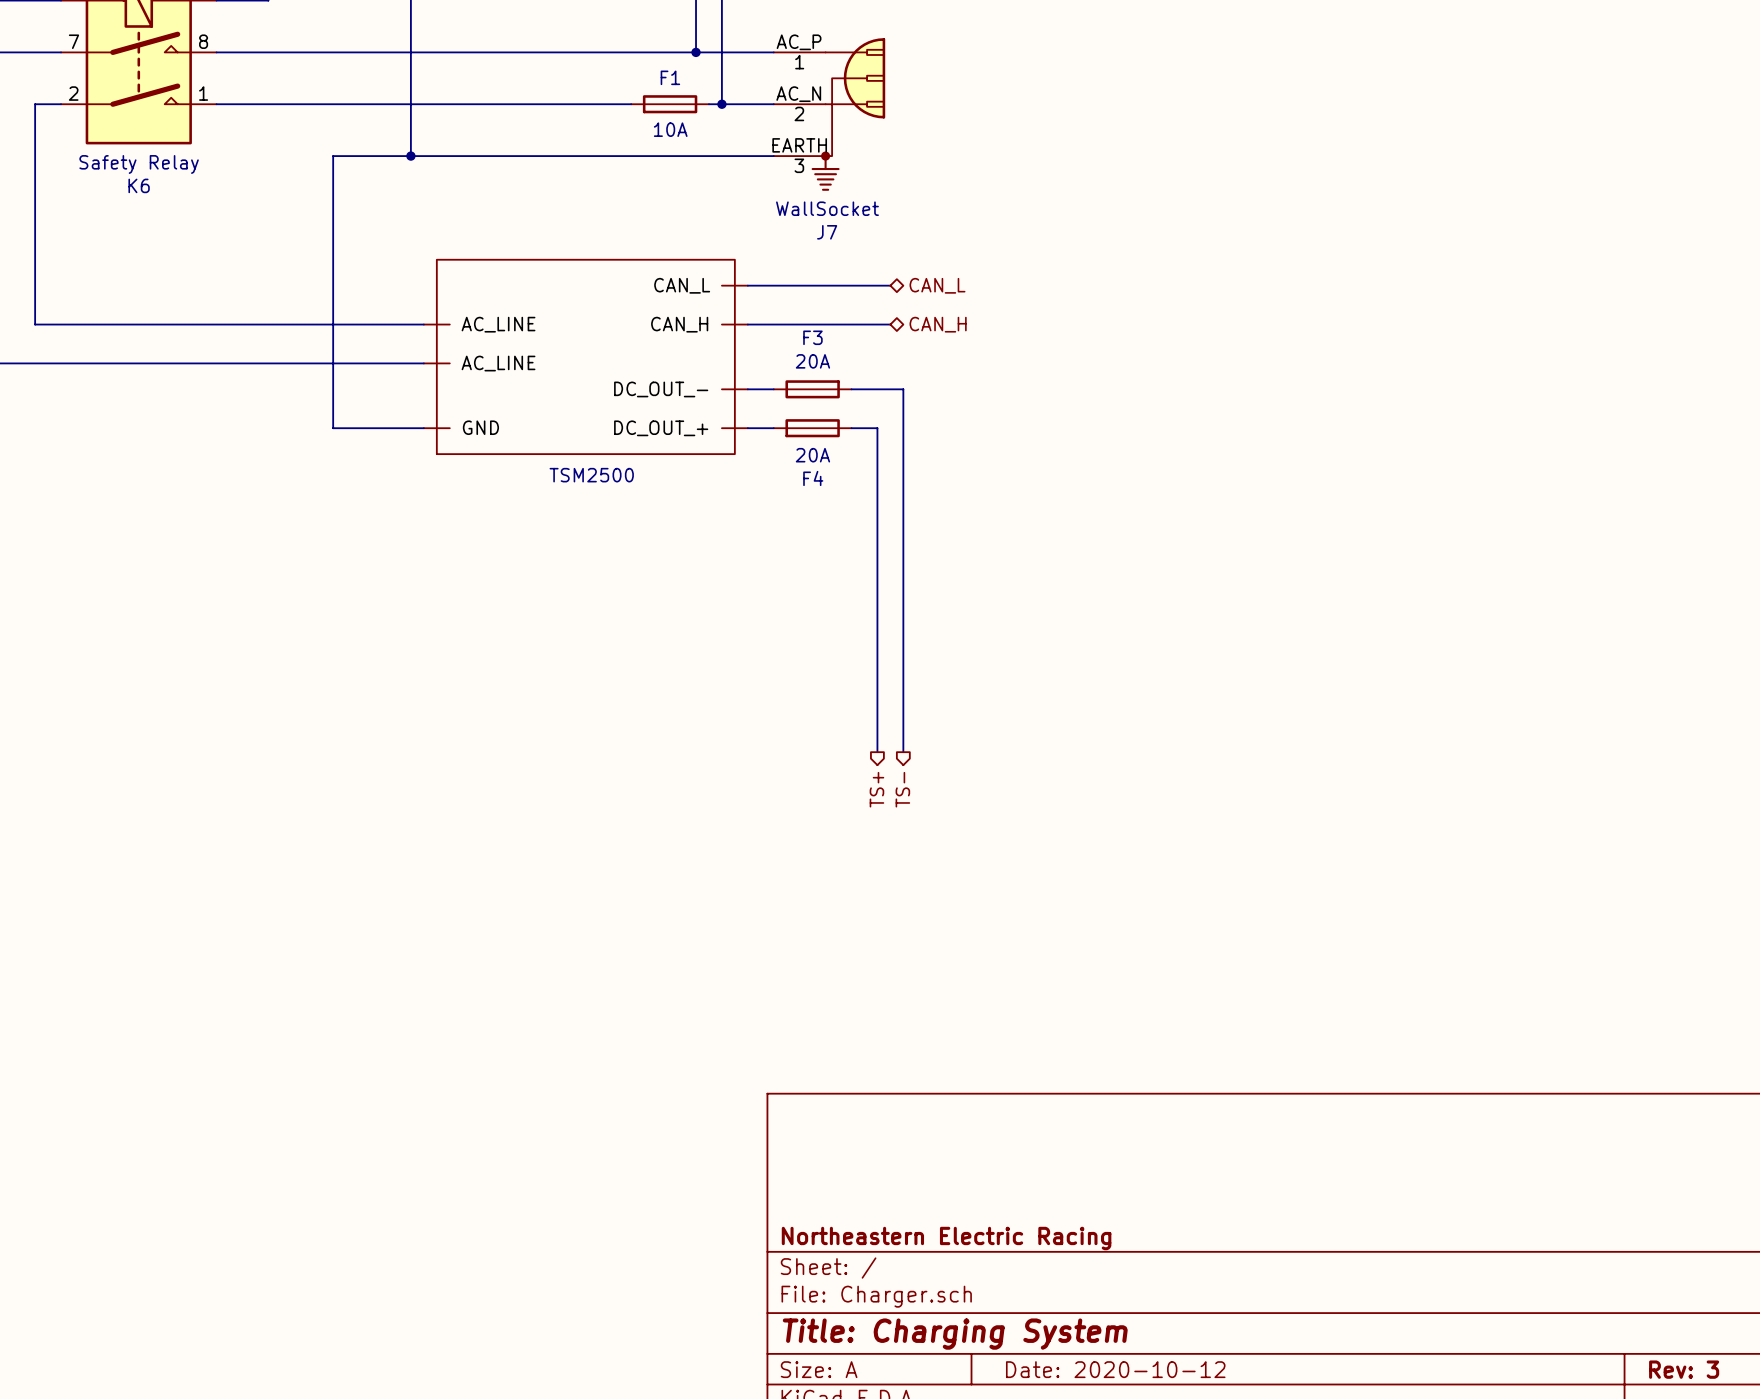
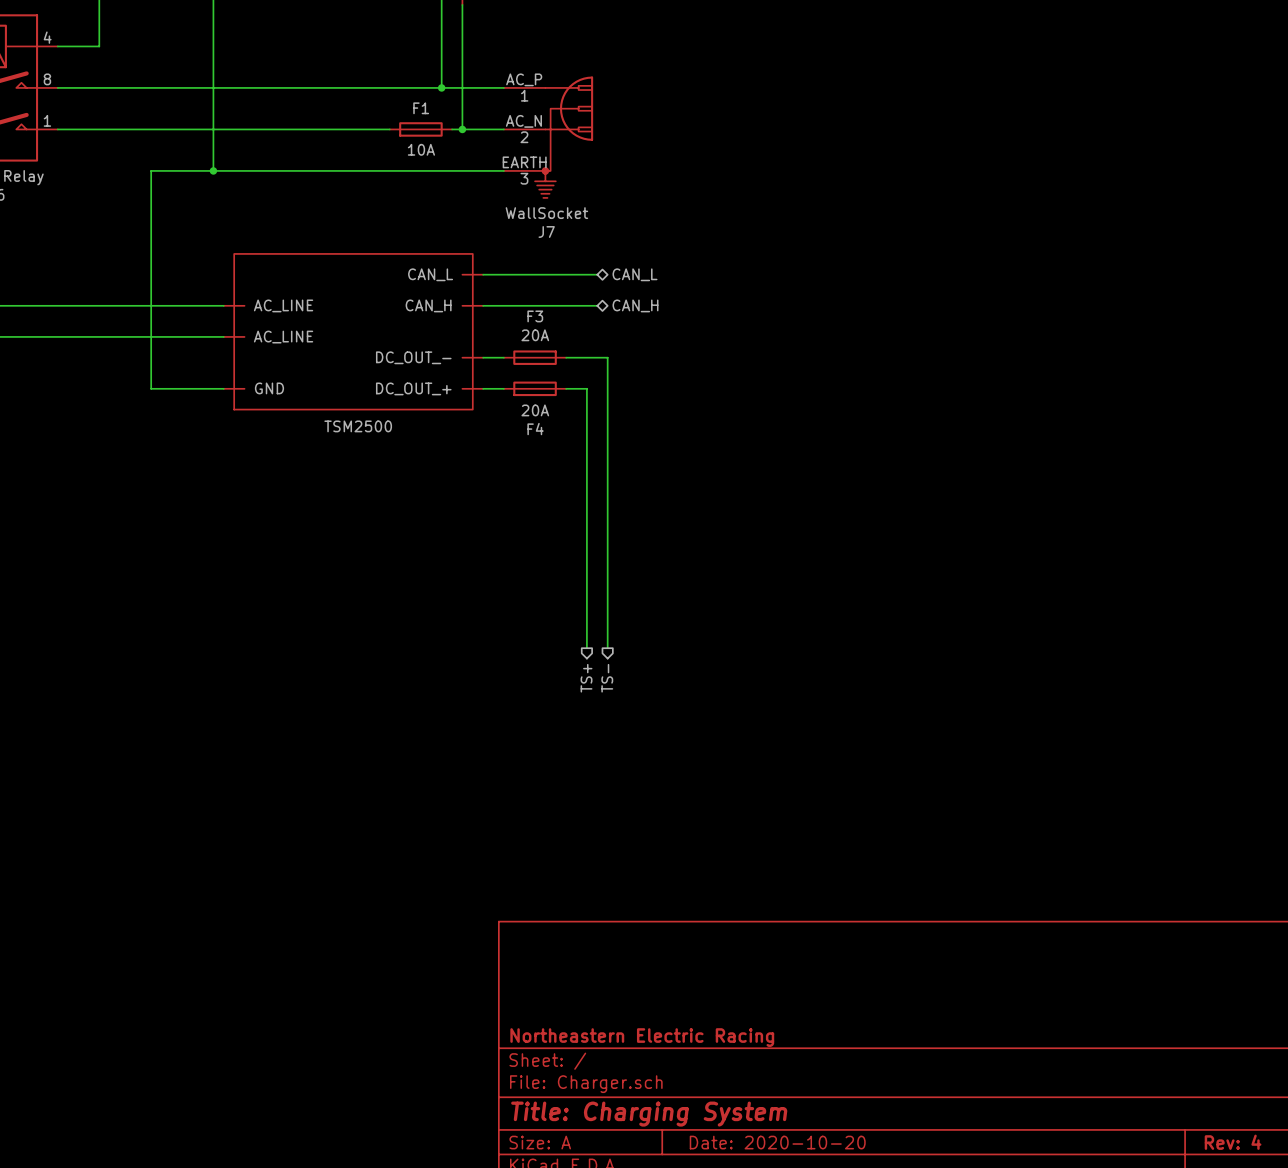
title block: Date: 2020-10-12 (1115, 1369) -> Date: 2020-10-20 (777, 1142)
title block: Rev: 3 (1684, 1369) -> Rev: 4 (1233, 1142)

